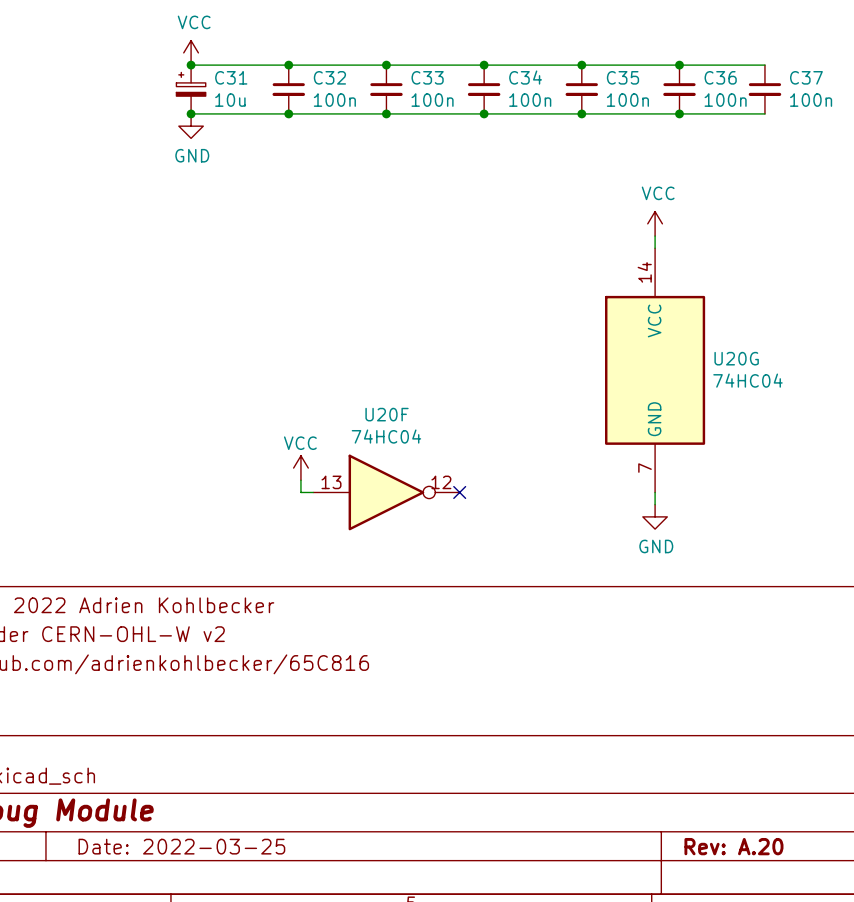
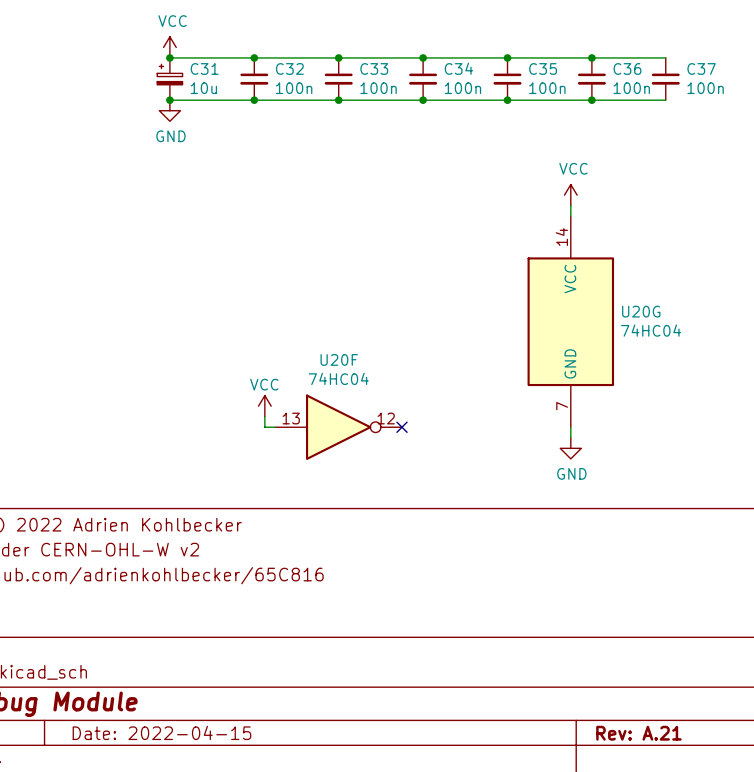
title block: Date: 2022-03-25 (181, 846) -> Date: 2022-04-15 (161, 732)
title block: Rev: A.20 (733, 846) -> Rev: A.21 (638, 733)

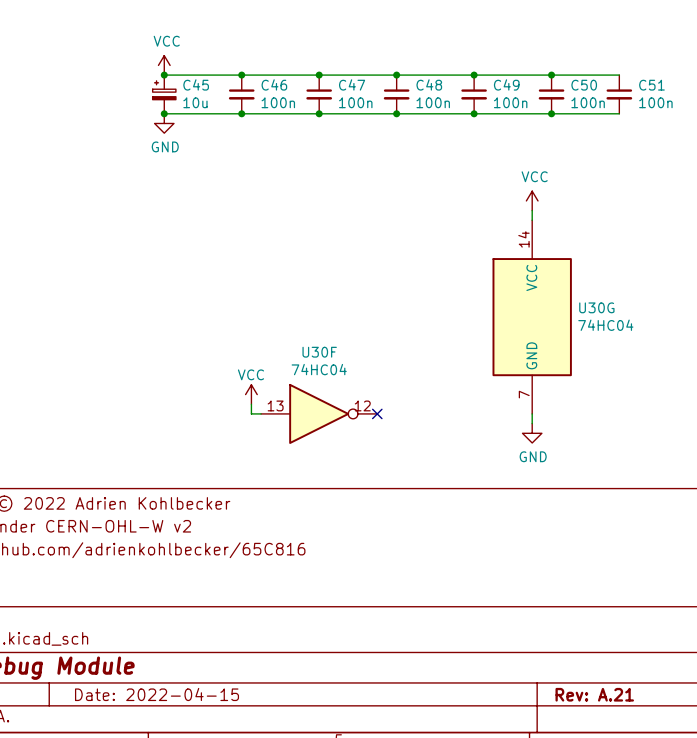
C31 name: C31 (204, 68) -> C45 (196, 84)
C32 name: C32 (289, 68) -> C46 (274, 84)
C33 name: C33 (374, 68) -> C47 (352, 84)
C34 name: C34 (458, 68) -> C48 (429, 84)
C35 name: C35 (543, 68) -> C49 (506, 84)
C36 name: C36 (627, 68) -> C50 (584, 85)
C37 name: C37 (701, 68) -> C51 (651, 85)
U20G name: U20G (641, 311) -> U30G (596, 307)
U20F name: U20F (339, 359) -> U30F (319, 352)

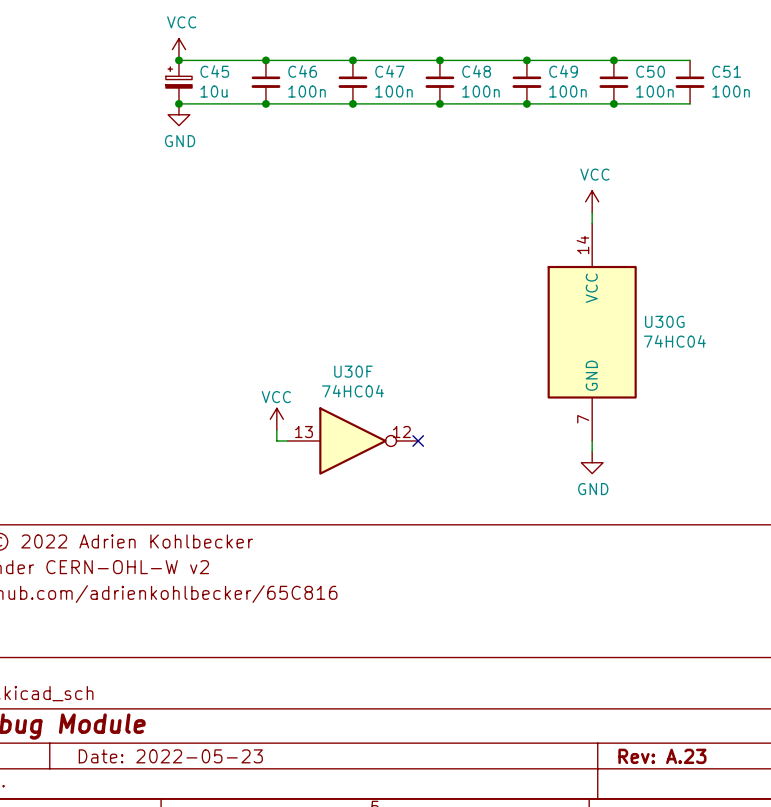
title block: Date: 2022-04-15 (157, 694) -> Date: 2022-05-23 (170, 756)
title block: Rev: A.21 (594, 694) -> Rev: A.23 (662, 756)

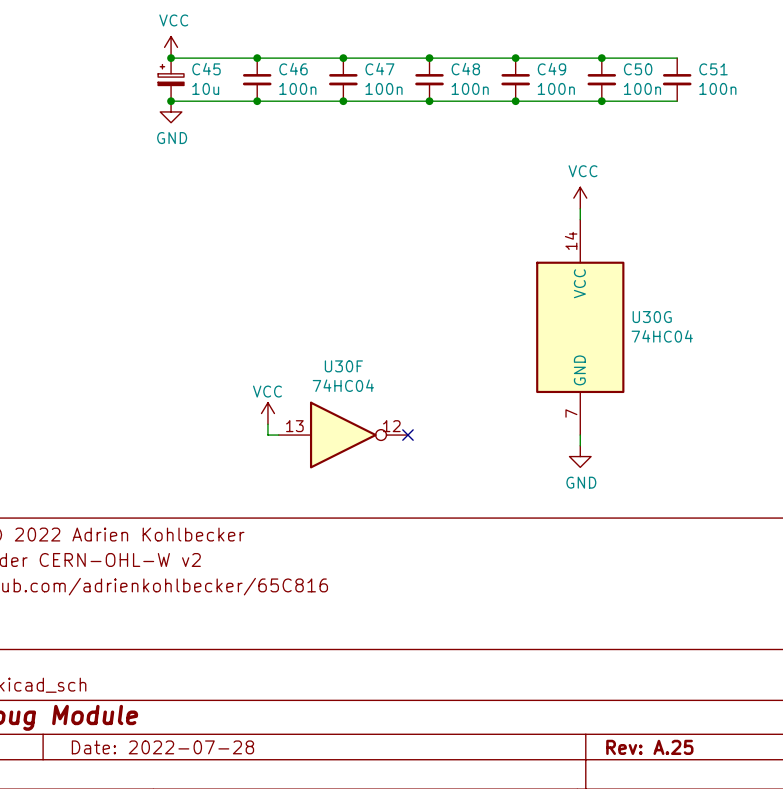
title block: Date: 2022-05-23 (170, 756) -> Date: 2022-07-28 (162, 747)
title block: Rev: A.23 (662, 756) -> Rev: A.25 (649, 747)

